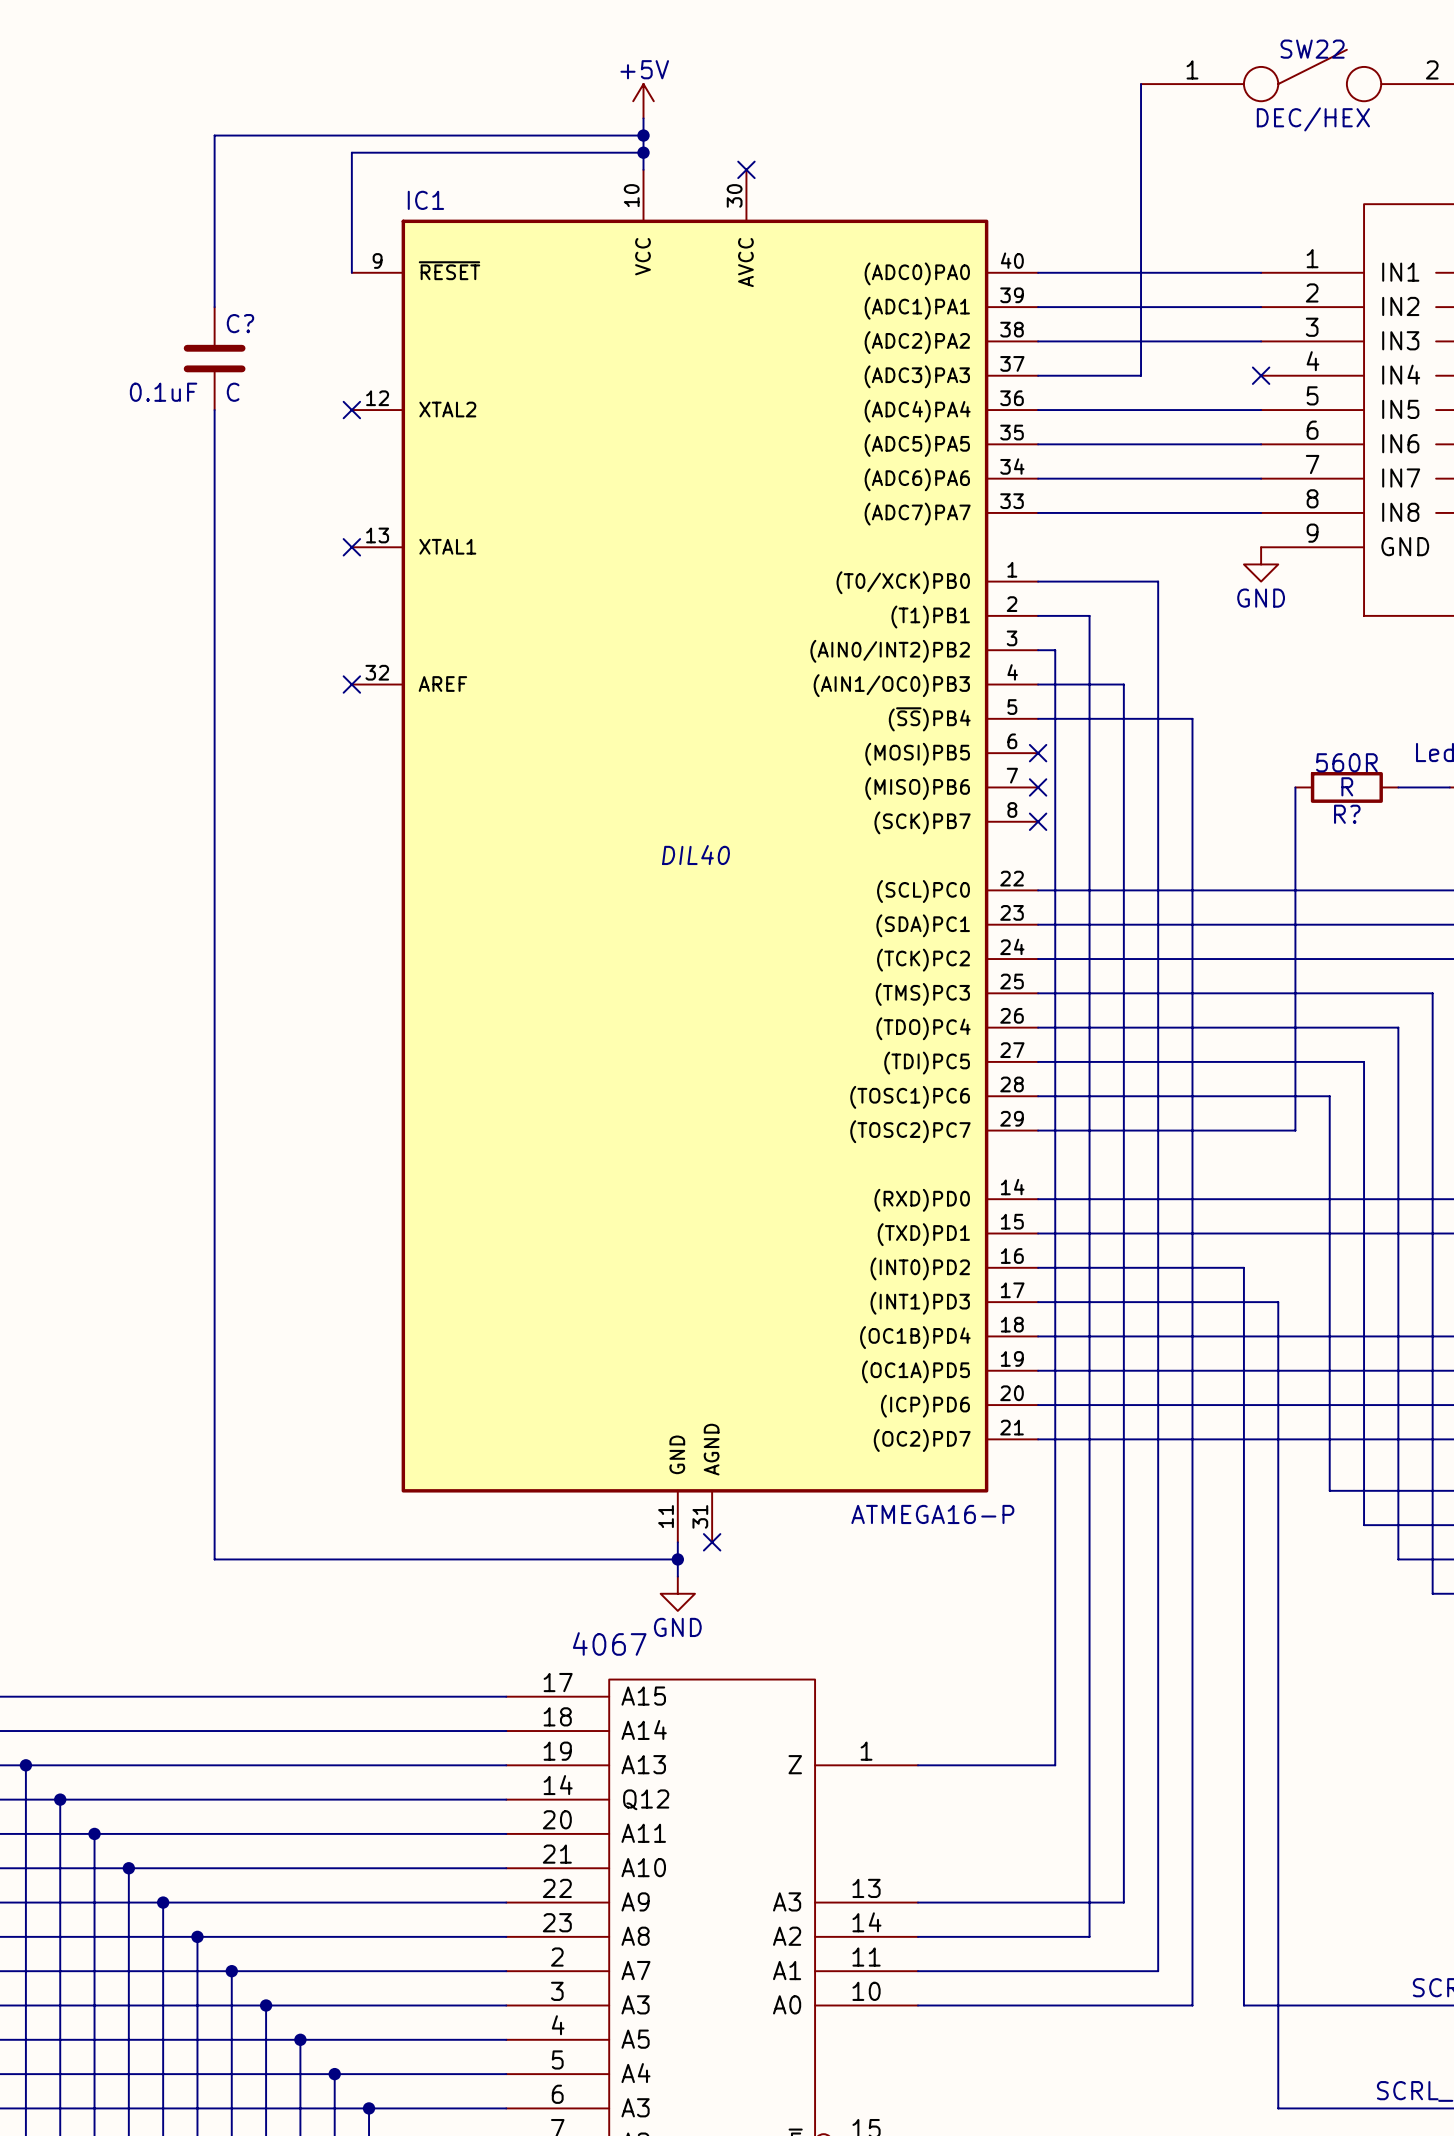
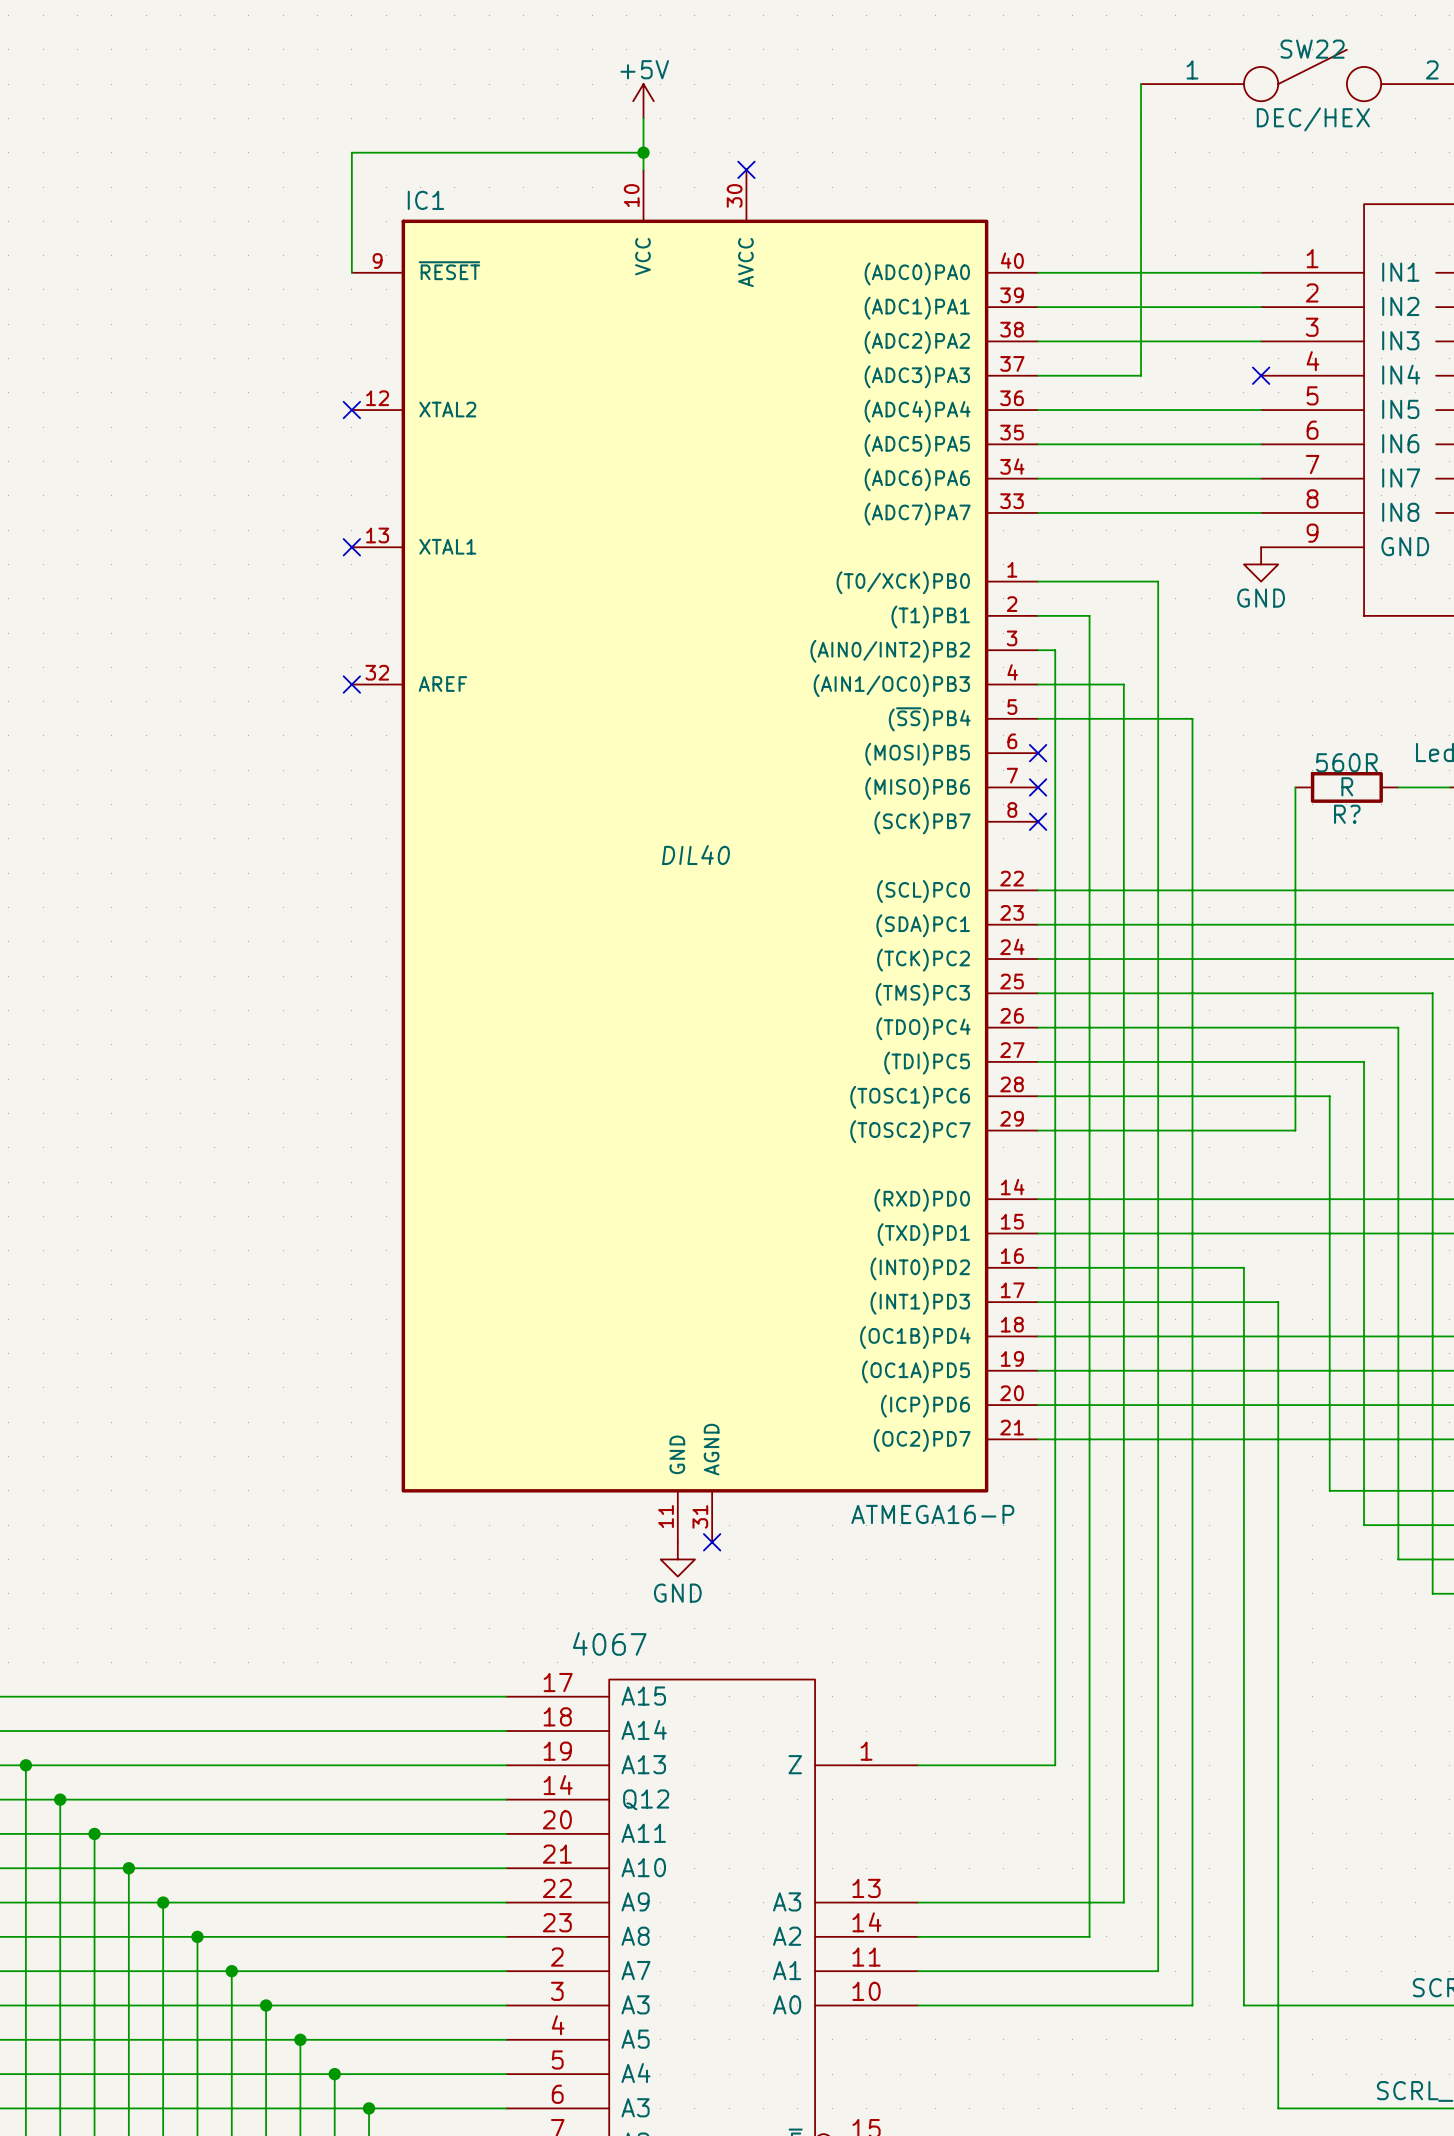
wire: (643, 135) (214, 135) (214, 307) -> none
junction: (643, 135) -> none
C?: C (214, 358) -> none
wire: (214, 410) (214, 1559) (677, 1559) -> none
junction: (677, 1559) -> none
power symbol position: GND (677, 1593) -> GND (677, 1559)

